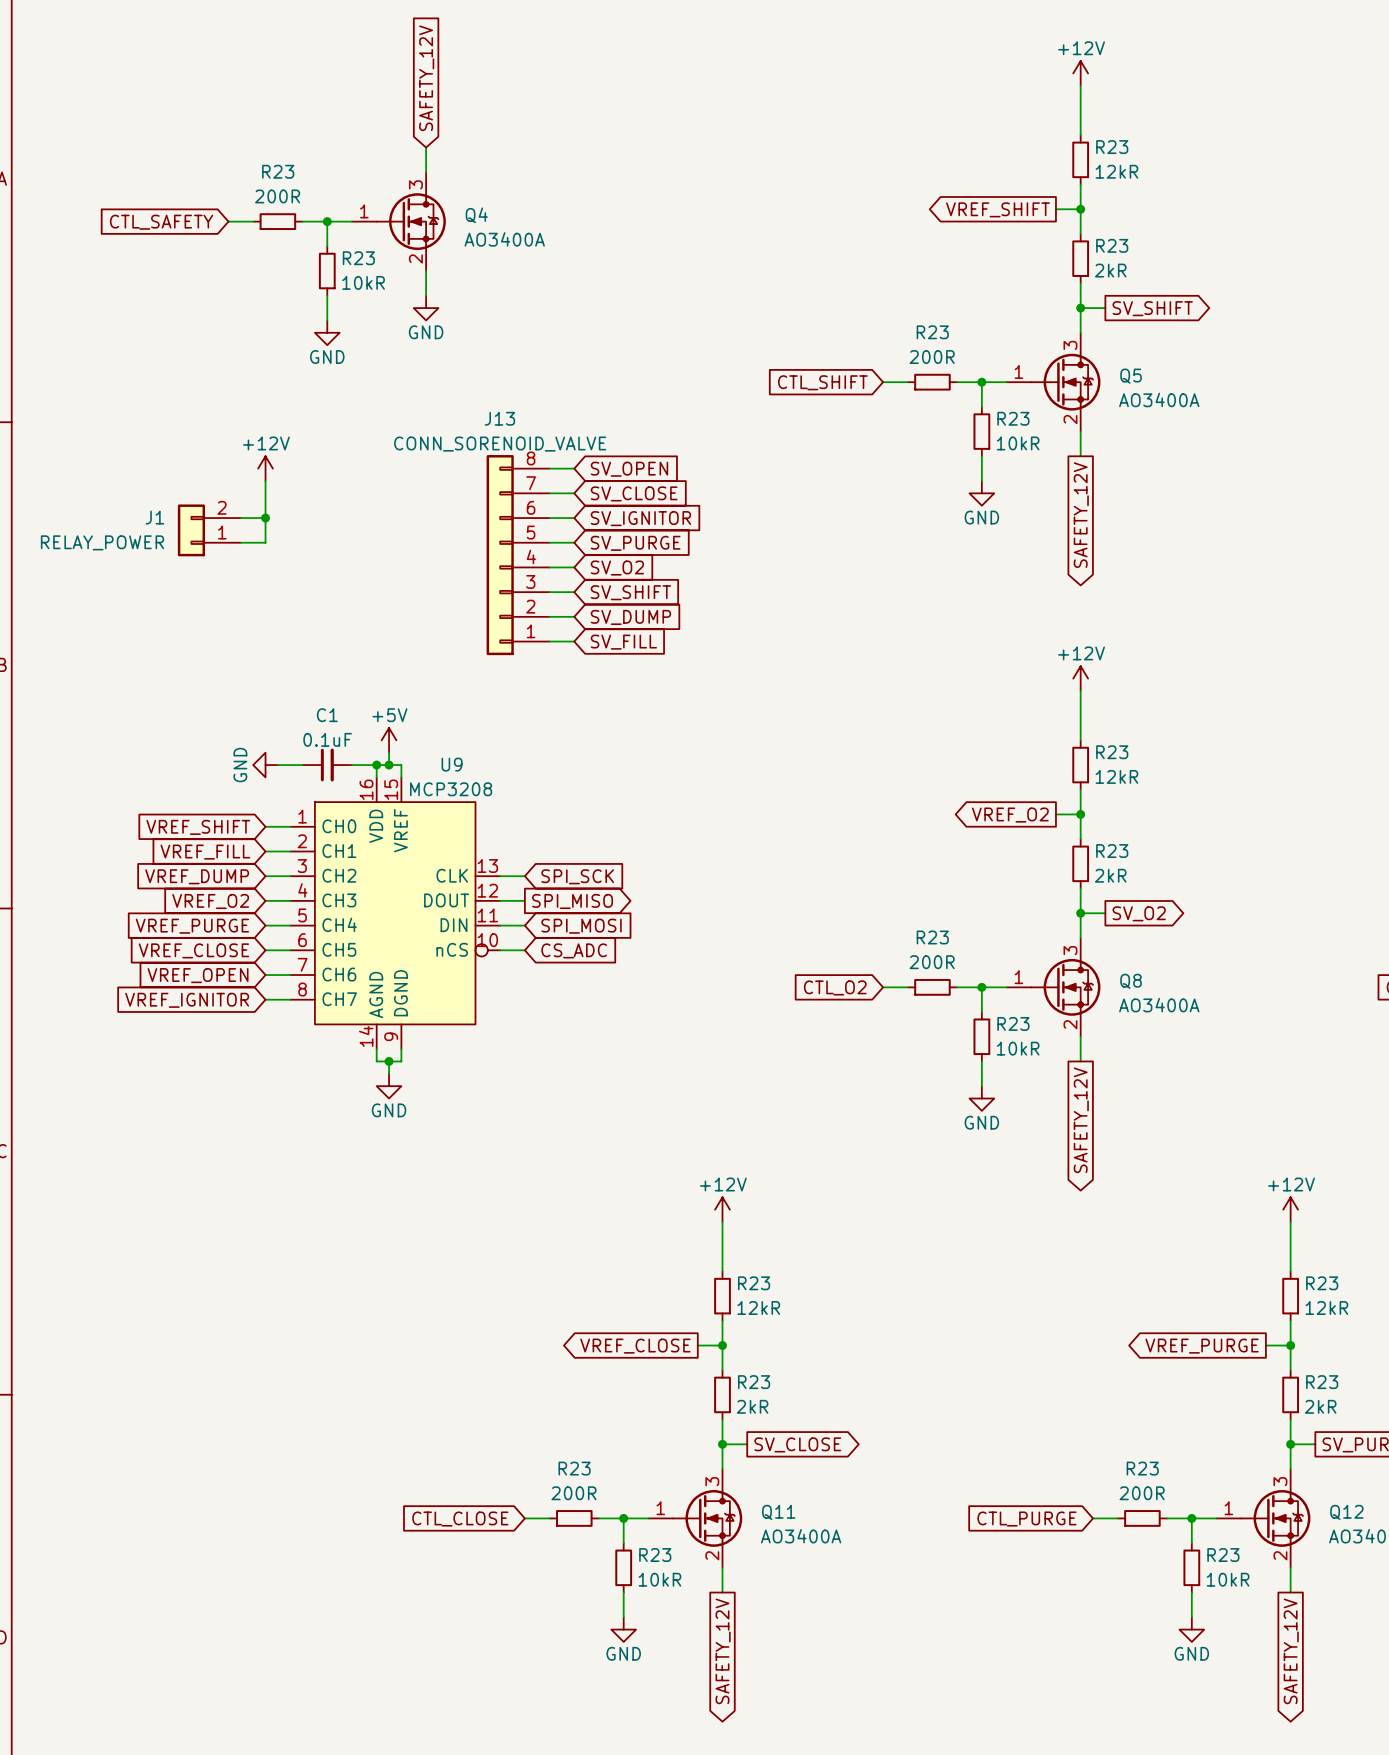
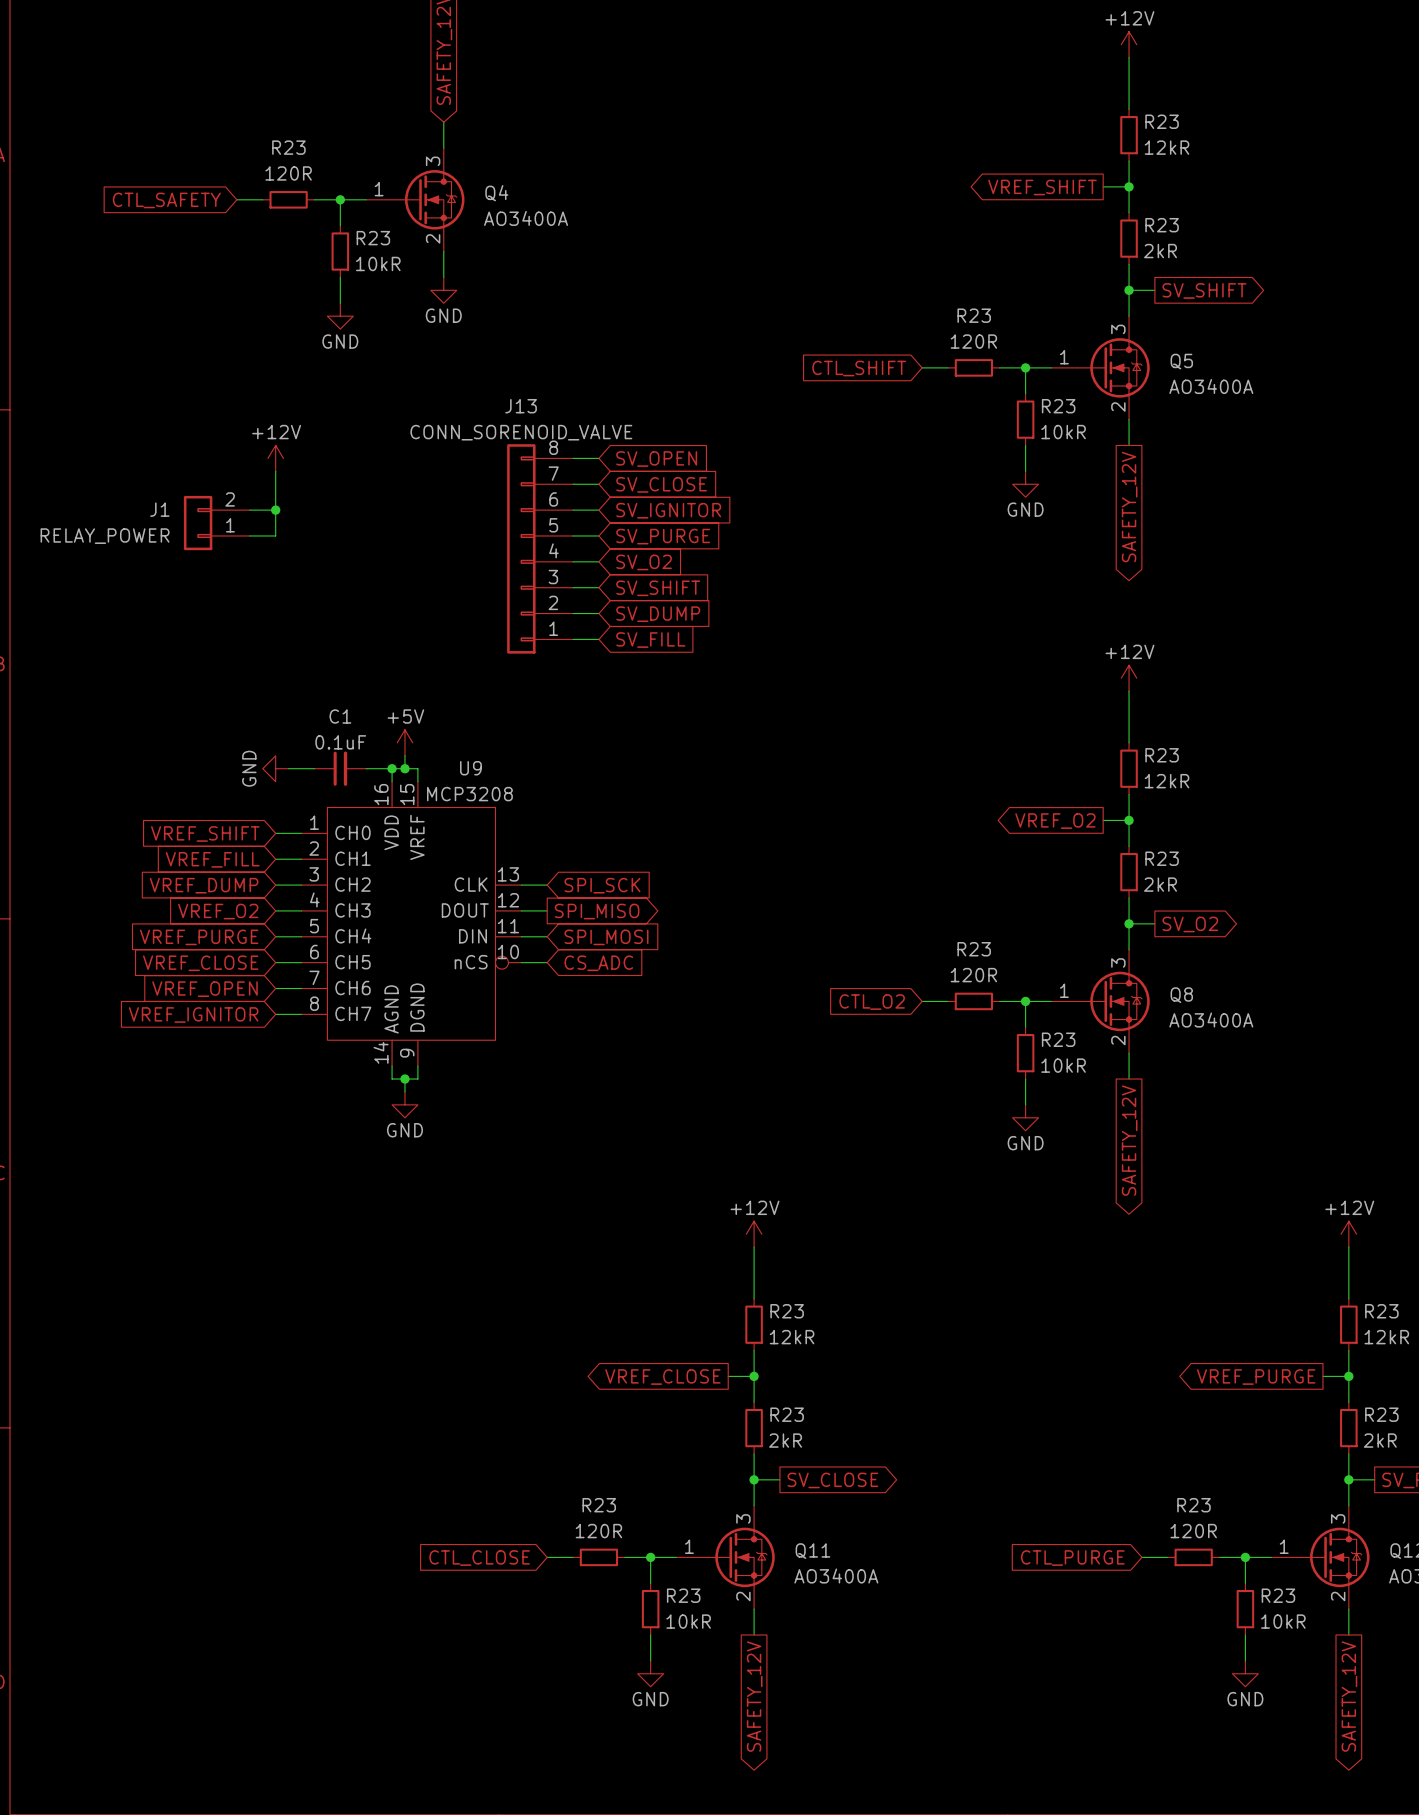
R23 value: 200R (277, 196) -> 120R (288, 173)
R23 value: 200R (932, 357) -> 120R (973, 341)
R23 value: 200R (932, 962) -> 120R (973, 975)
R23 value: 200R (574, 1493) -> 120R (598, 1531)
R23 value: 200R (1142, 1493) -> 120R (1193, 1531)

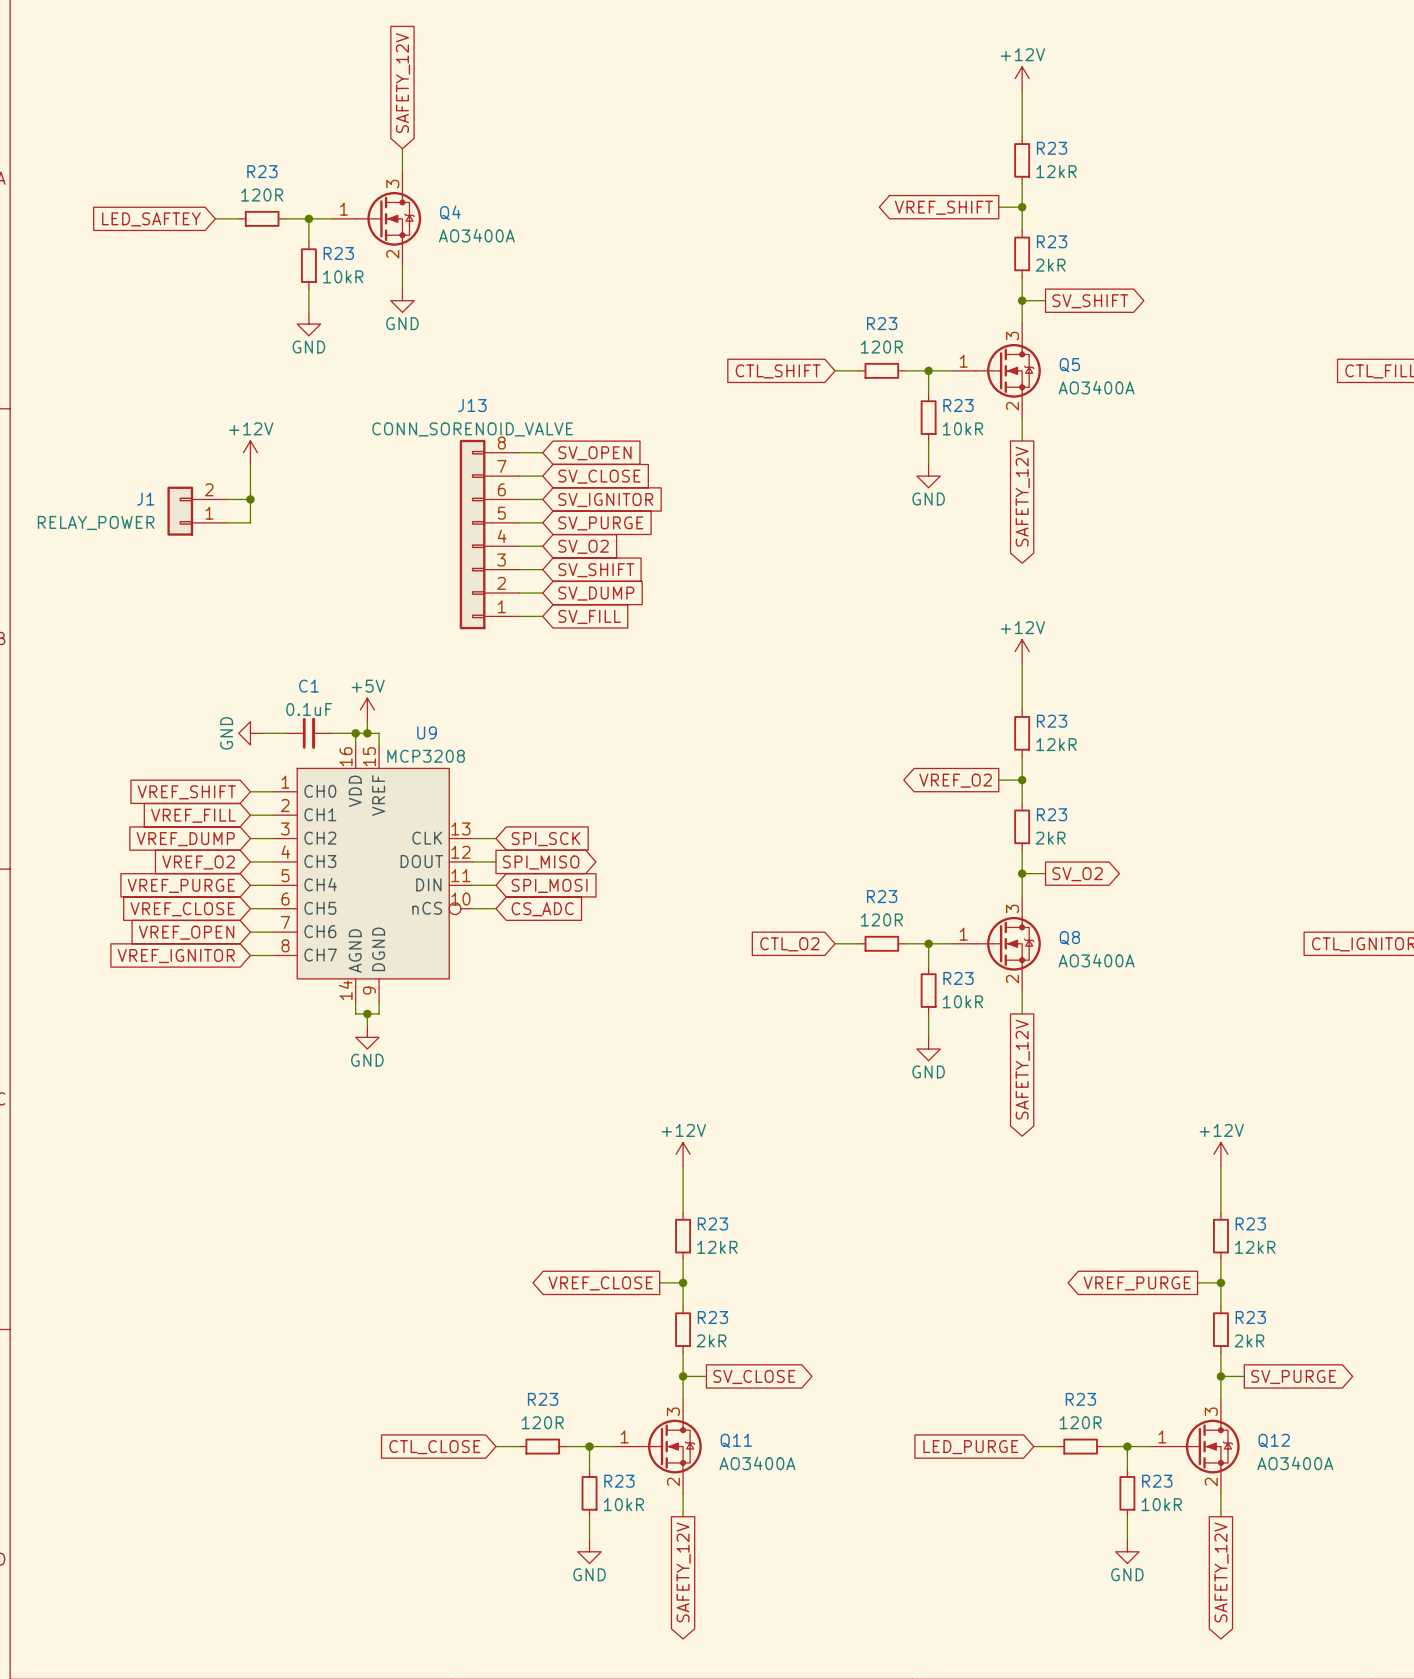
global label: CTL_SAFETY (166, 200) -> LED_SAFTEY (151, 219)
global label: CTL_PURGE (1072, 1558) -> LED_PURGE (970, 1447)

